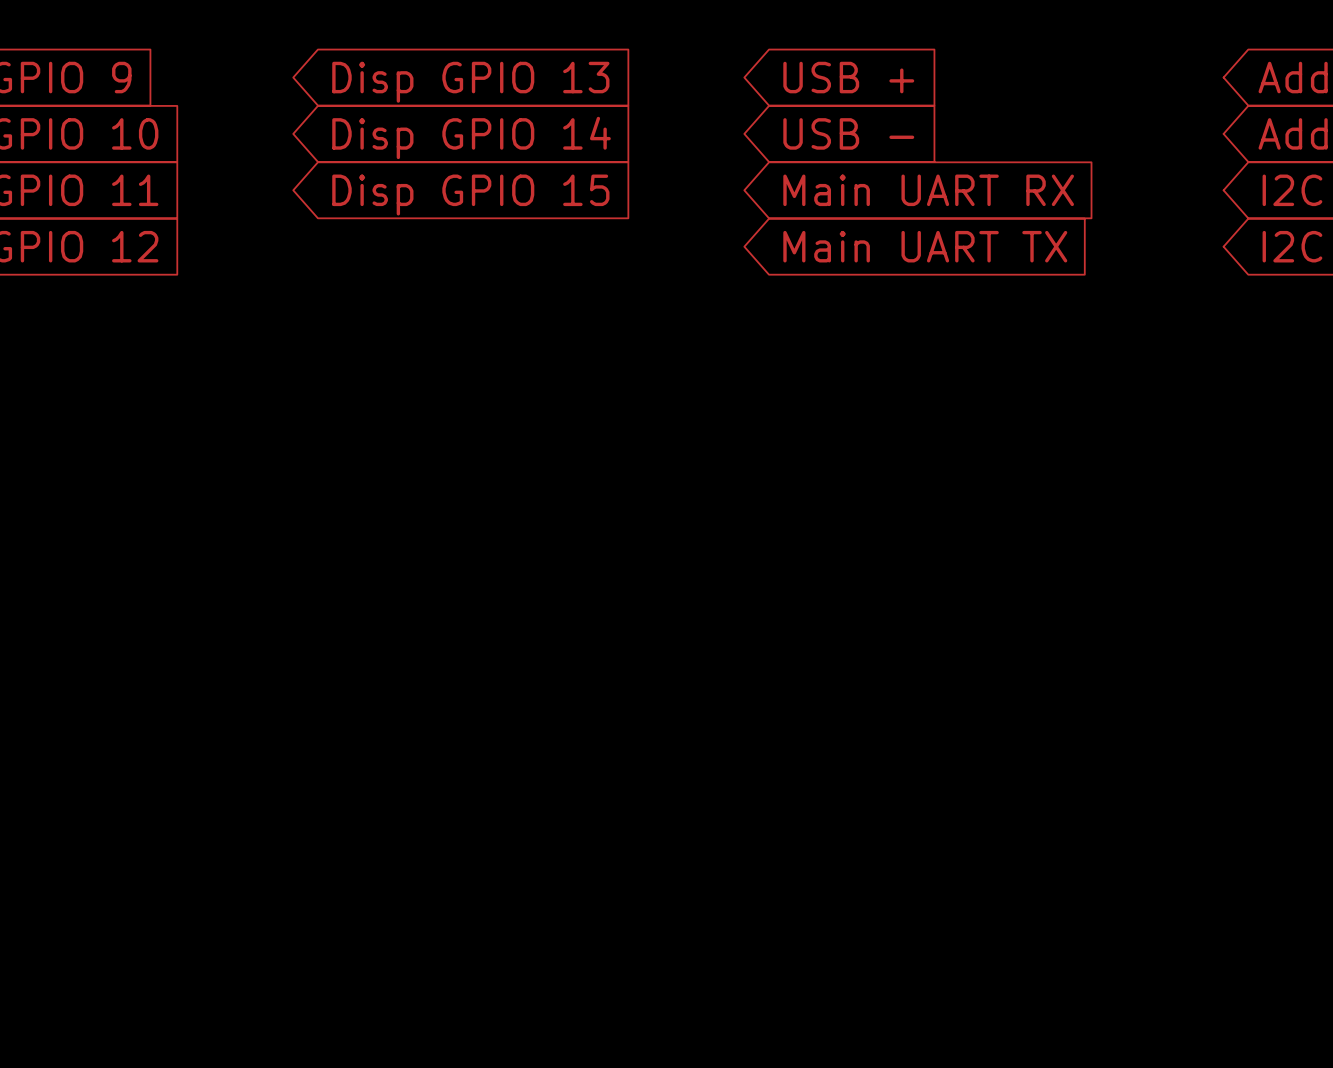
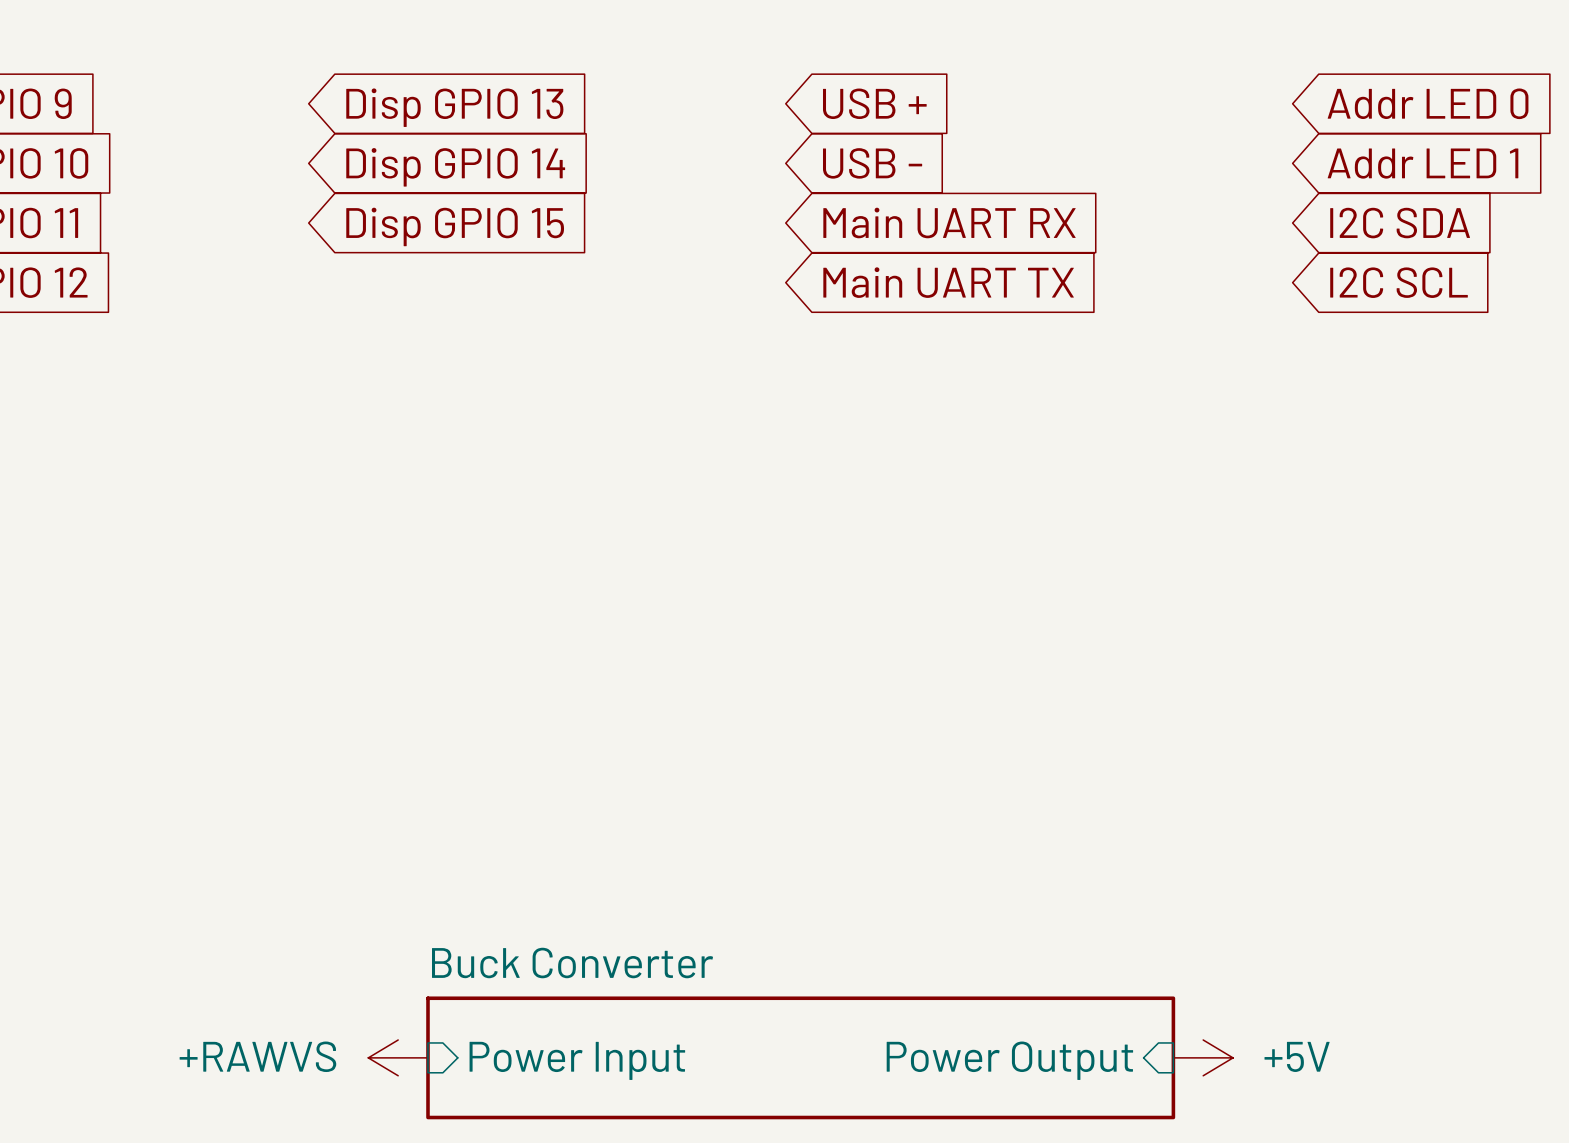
power symbol: none -> +RAWVS (398, 1057)
sheet Buck Converter: none -> (800, 1057)
power symbol: none -> +5V (1203, 1057)
sheet pin: none -> Power Input (577, 1060)
sheet pin: none -> Power Output (1009, 1060)

